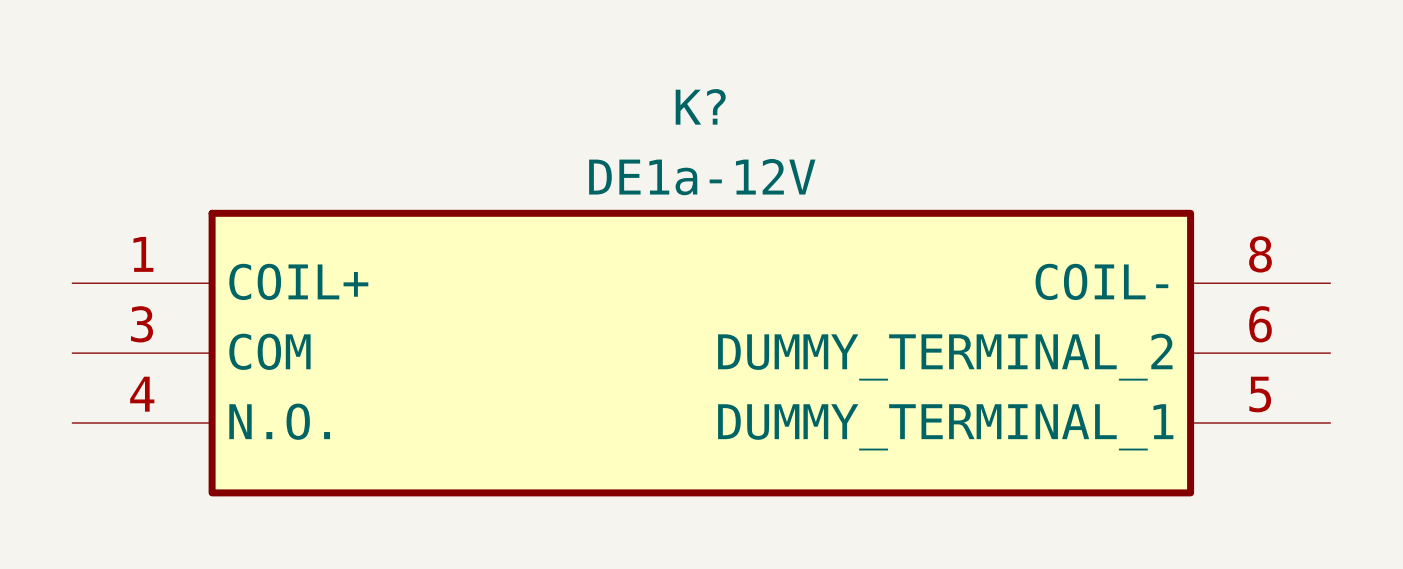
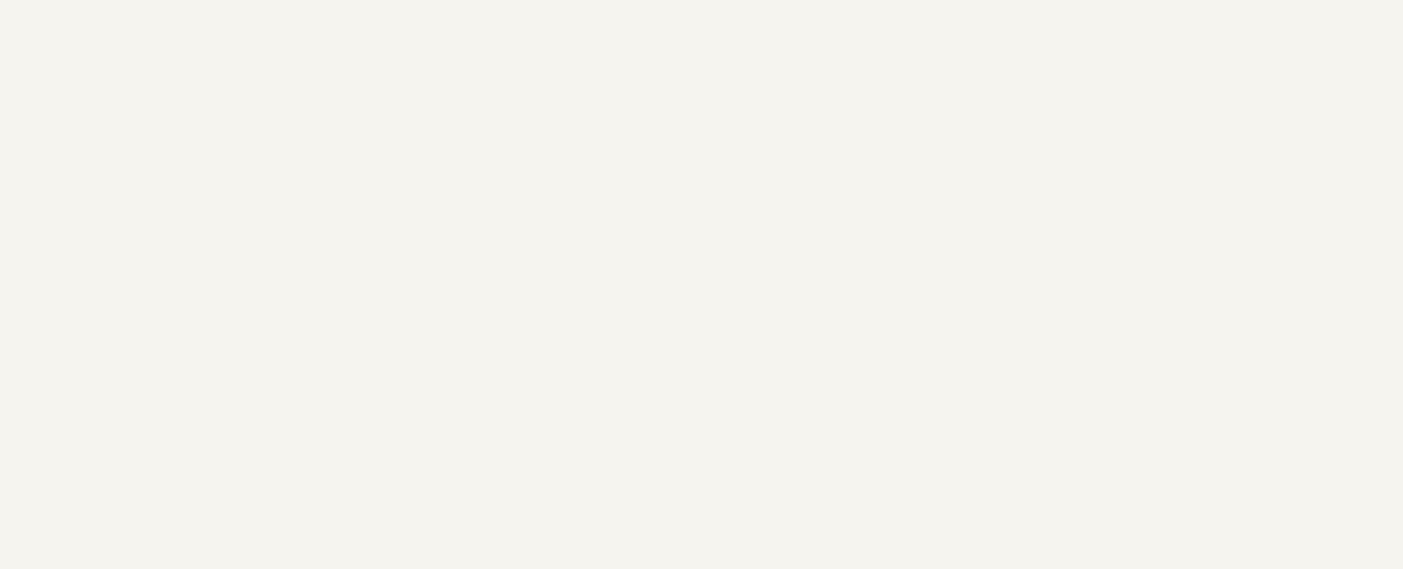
K?: DE1a-12V (701, 353) -> none

